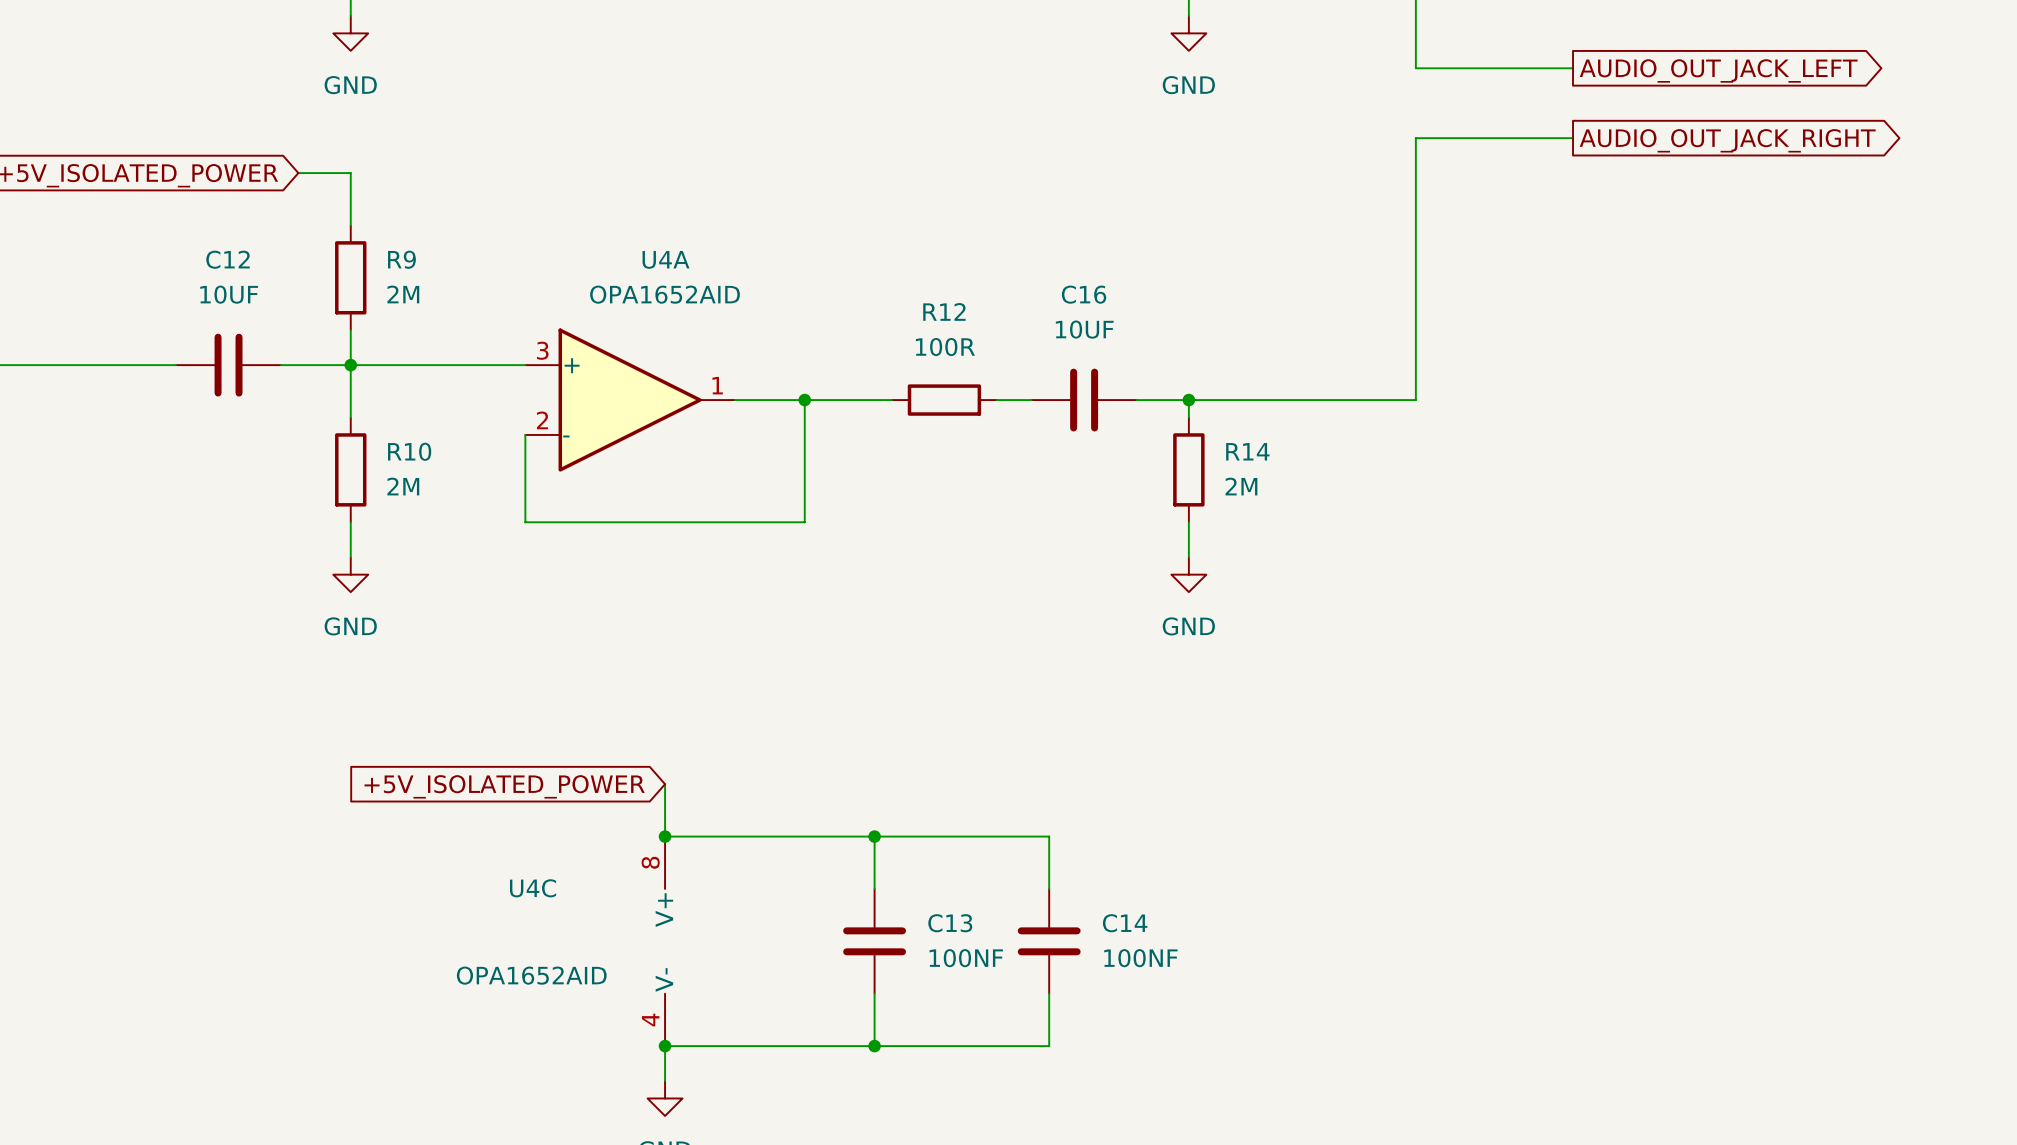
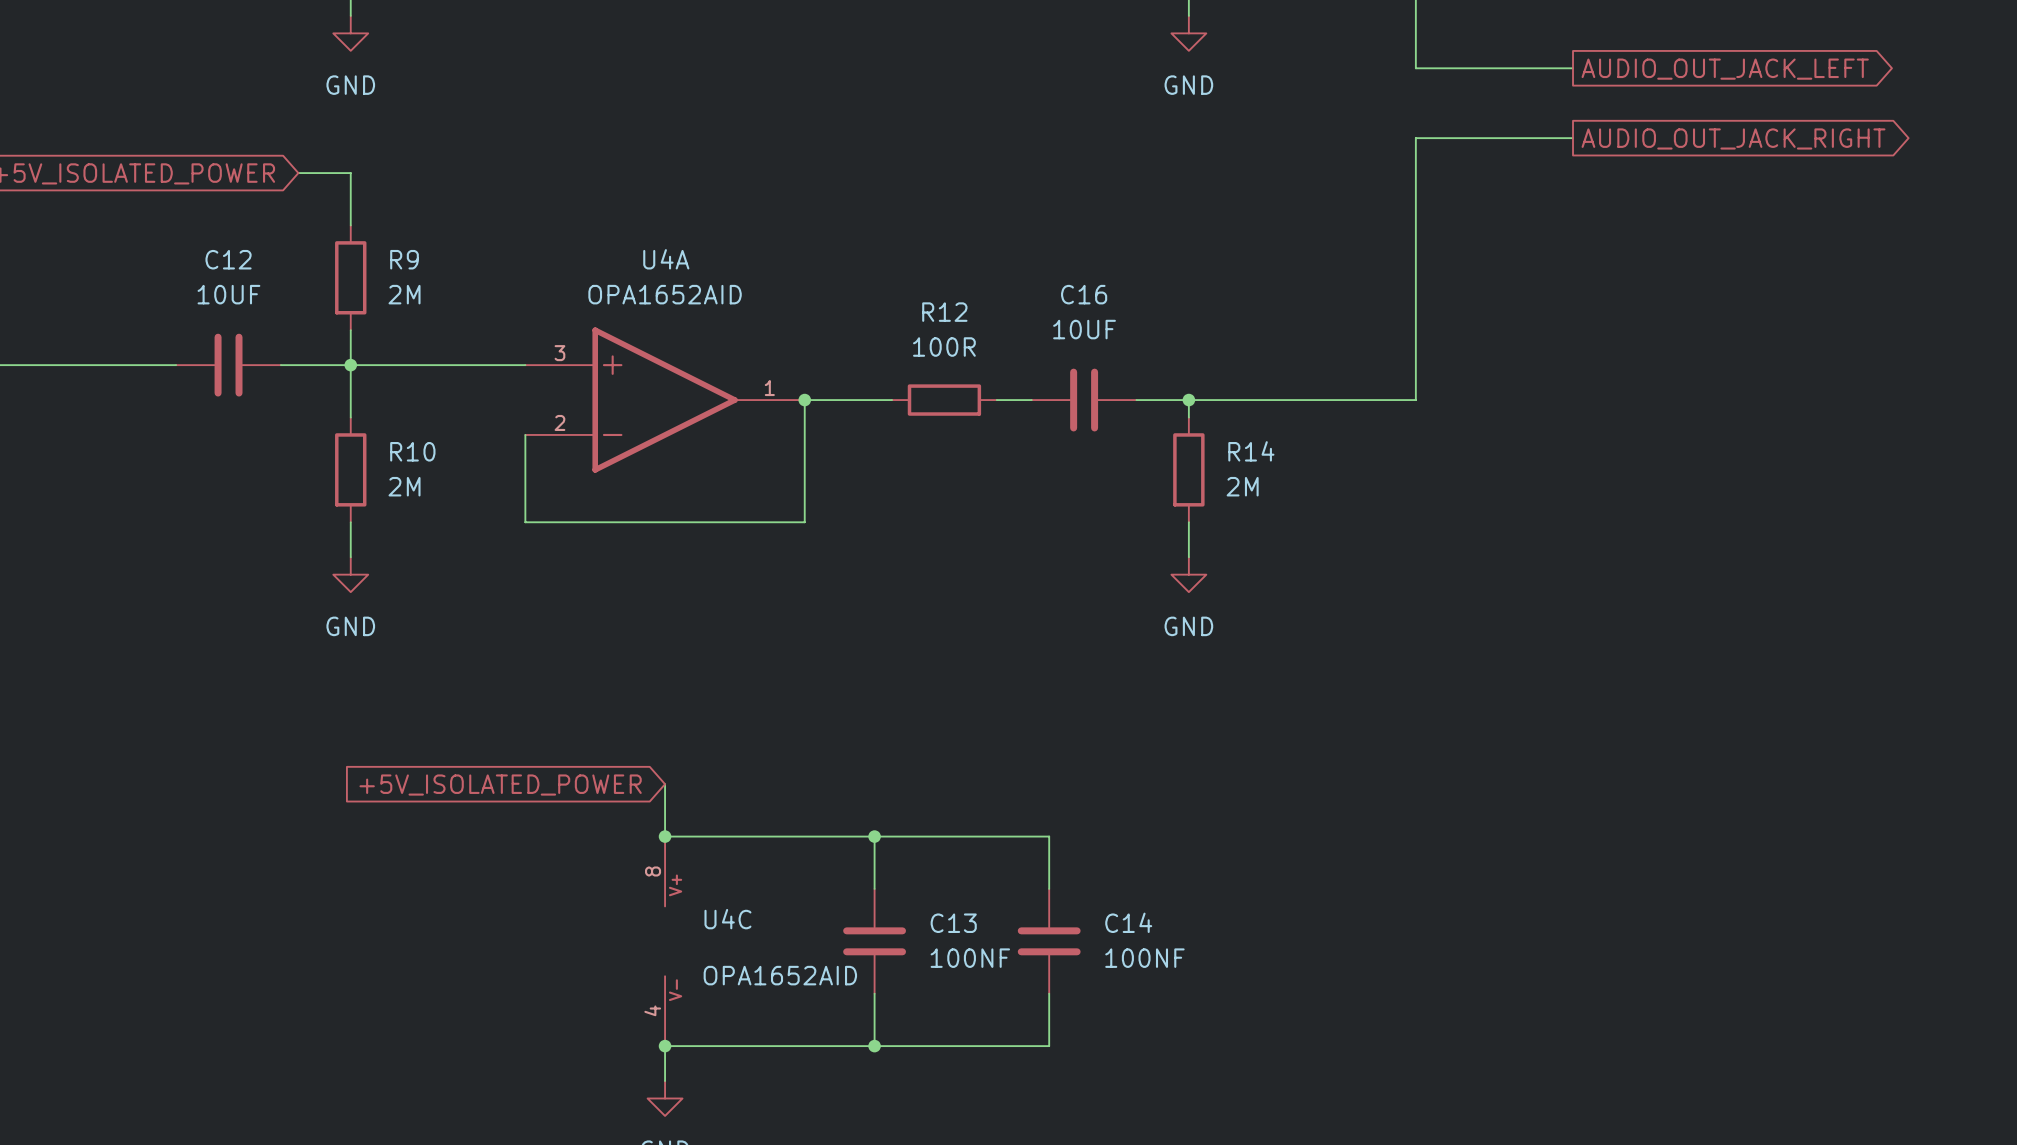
U4A symbol: [525, 328, 735, 472] -> [525, 327, 805, 473]
U4C symbol: [665, 836, 666, 1047] -> [665, 836, 666, 1047]
U4C name position: U4C (533, 888) -> U4C (727, 919)
U4C value position: OPA1652AID (531, 975) -> OPA1652AID (780, 975)

